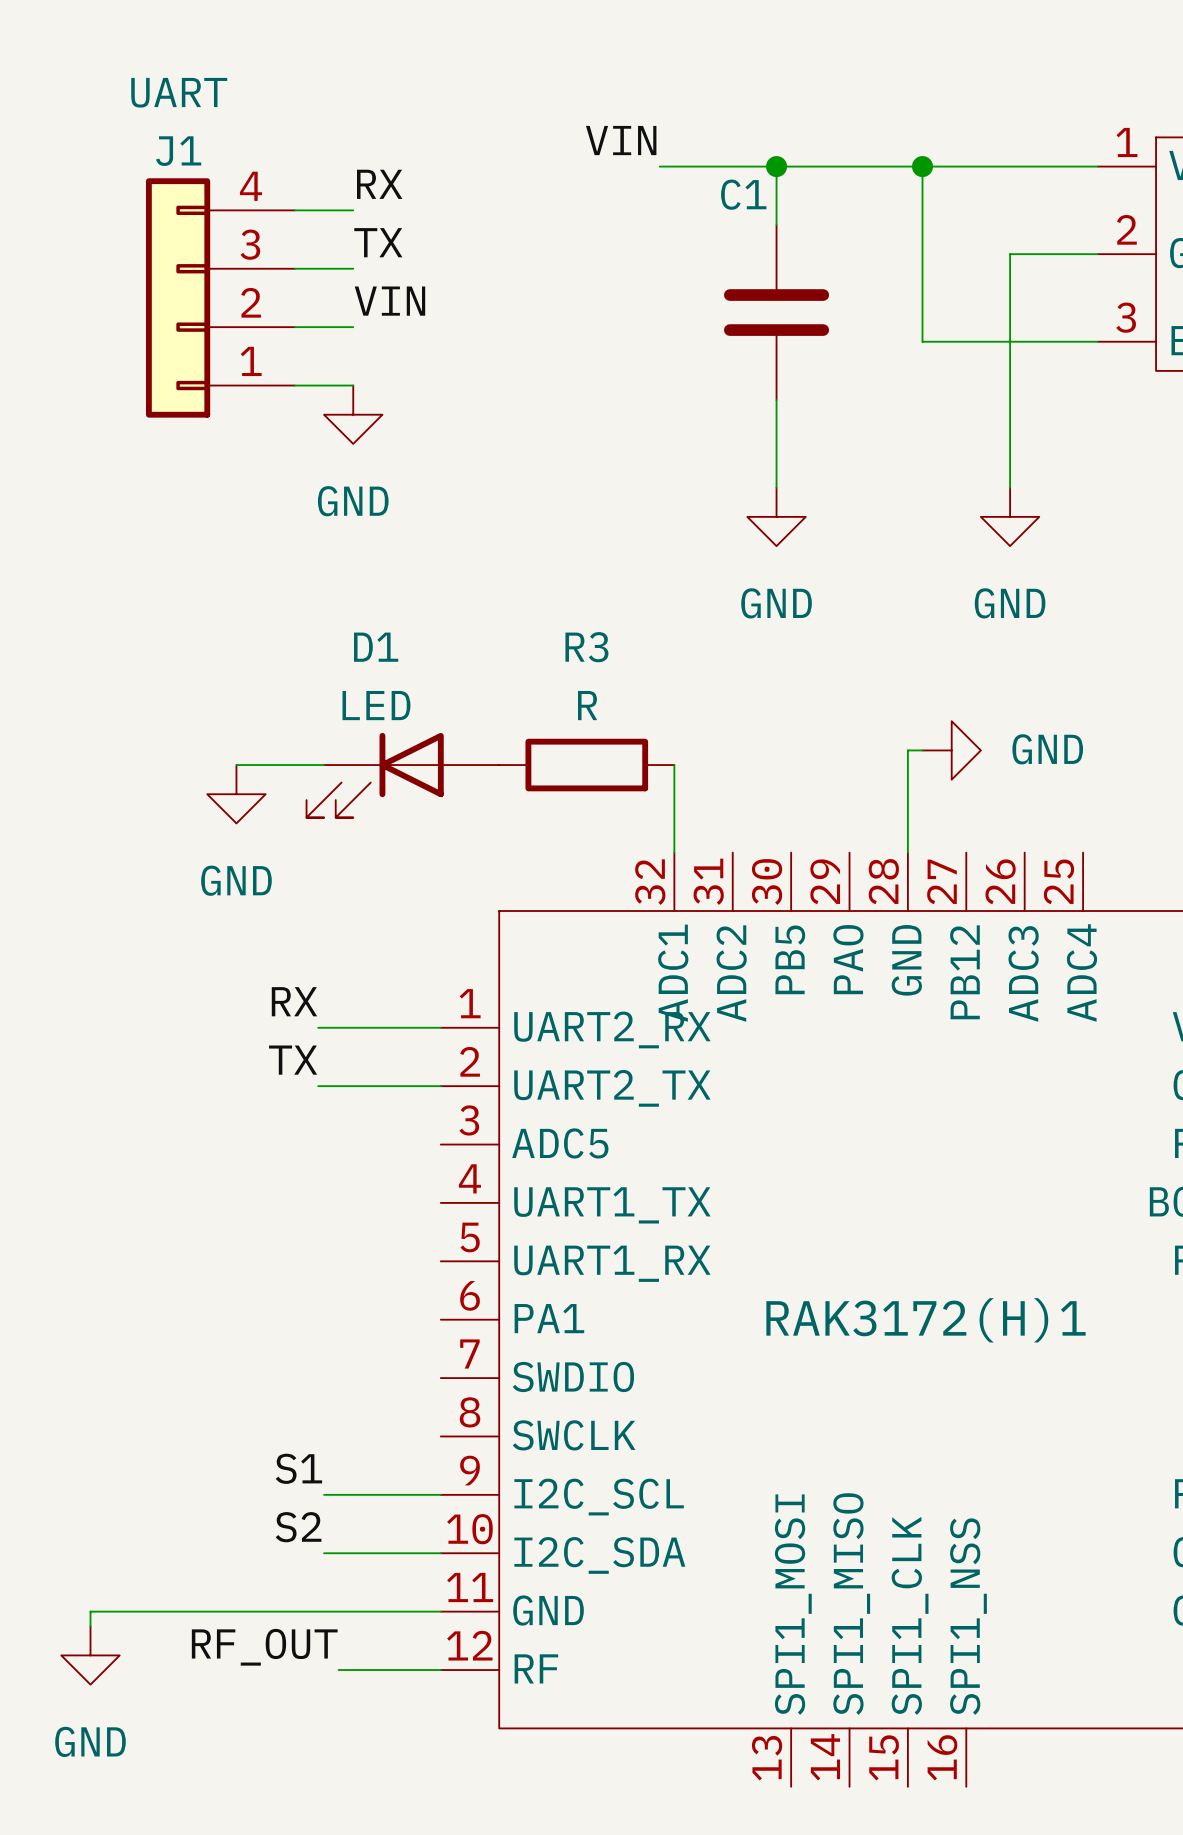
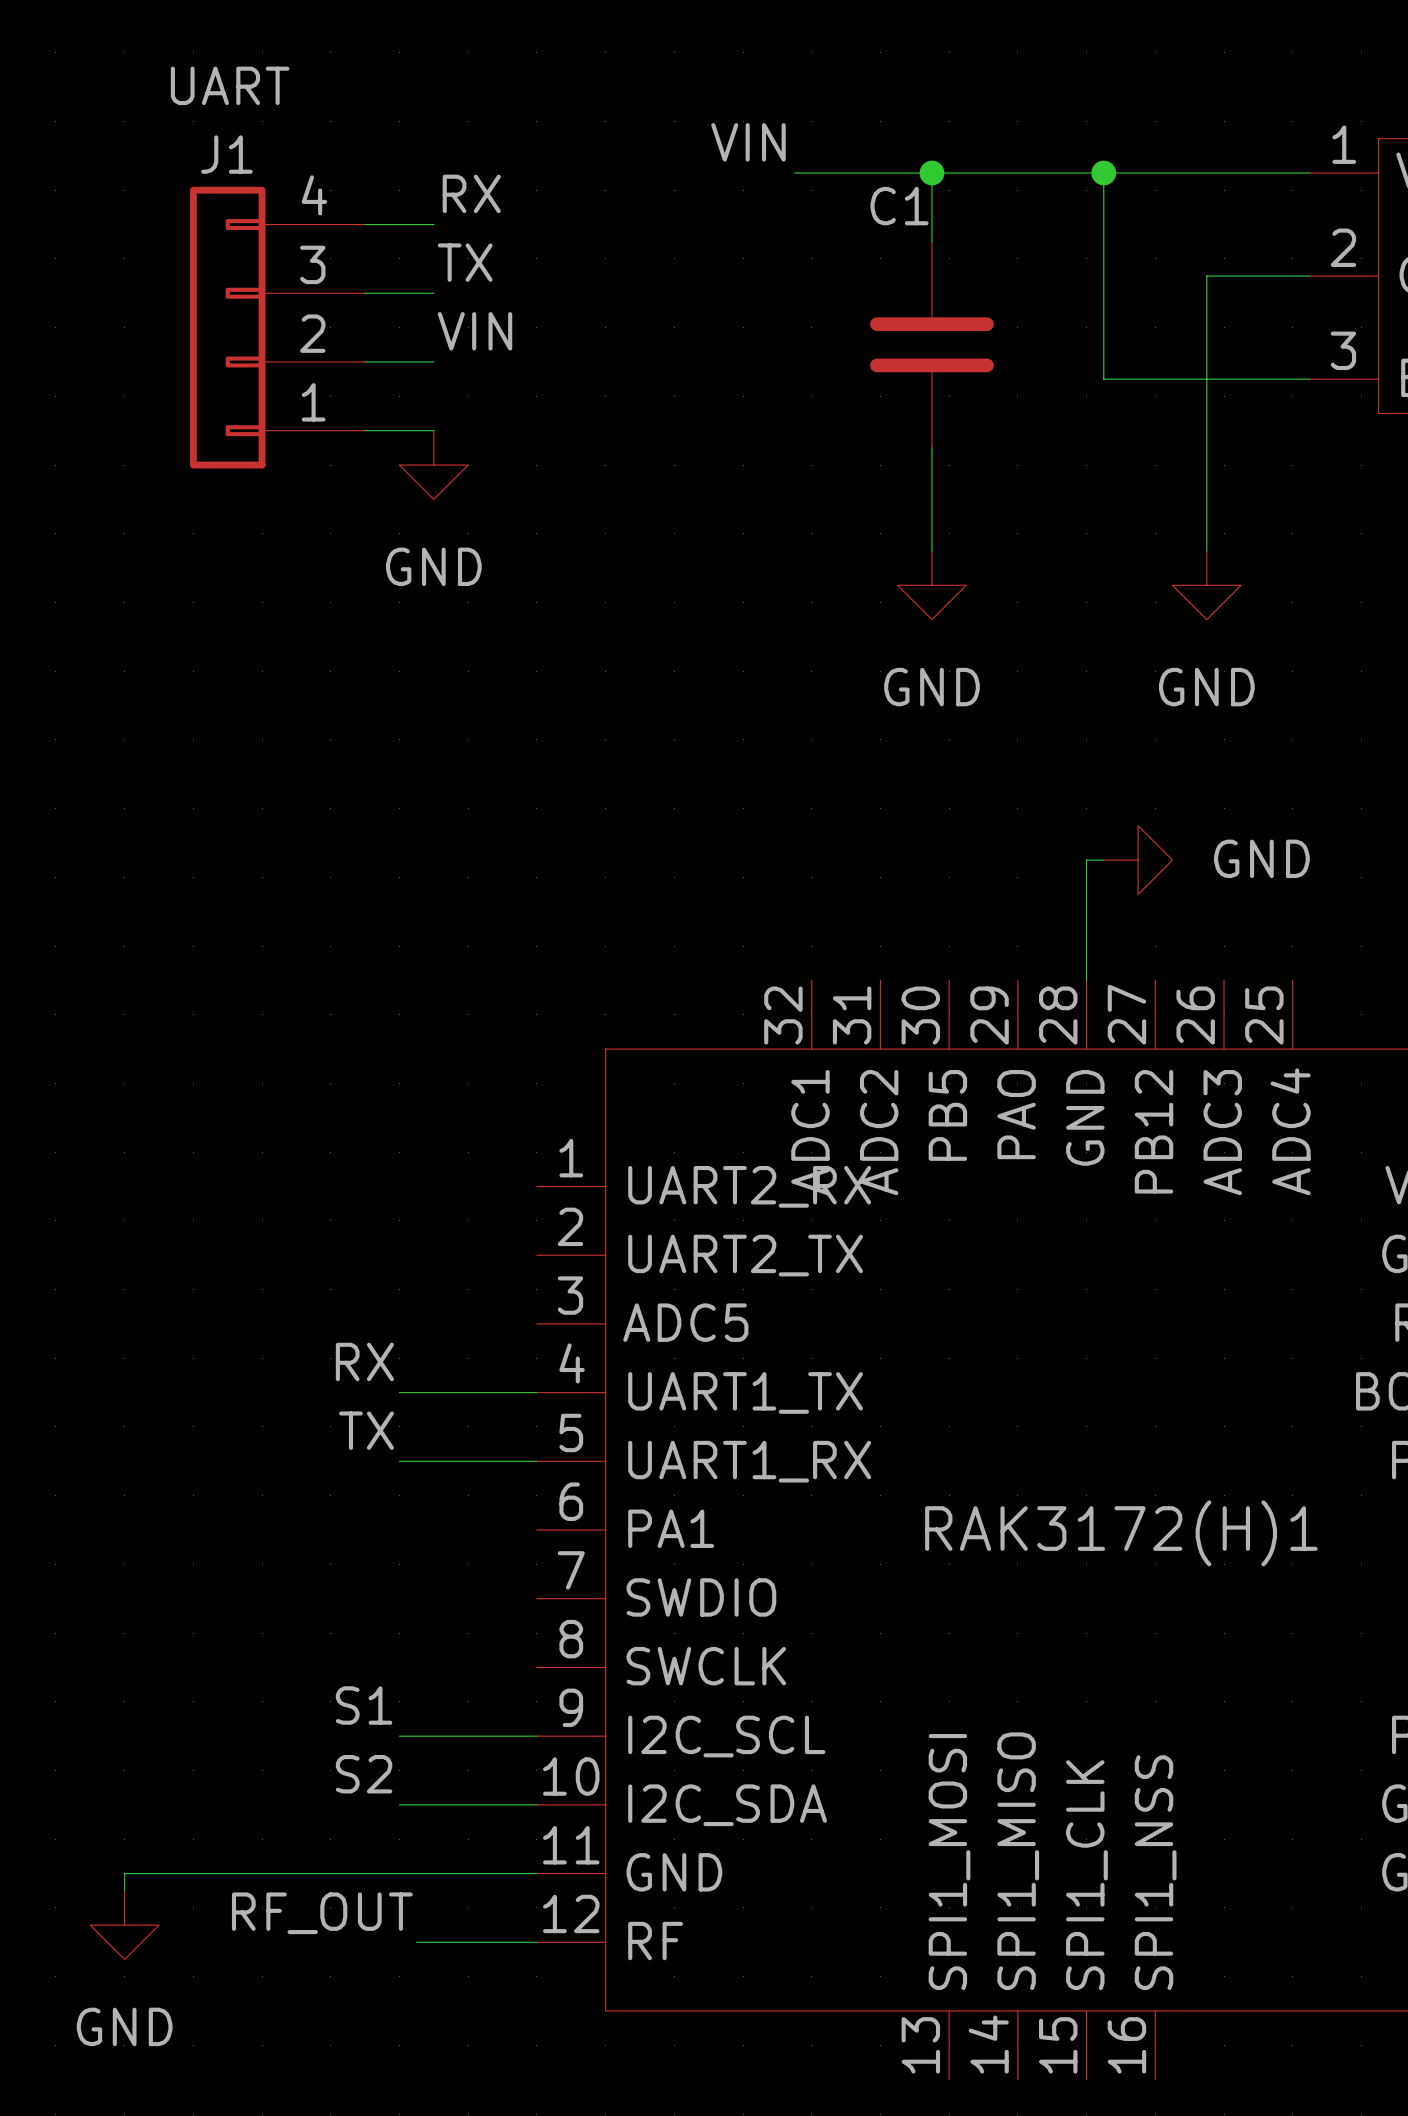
wire: (236, 765) (324, 765) -> none
R3: R (586, 765) -> none
wire: (674, 765) (674, 852) -> none
D1: LED (402, 775) -> none
power symbol: GND (236, 794) -> none
label position: RX (294, 1001) -> RX (364, 1361)
wire: (318, 1027) (440, 1027) -> none
label position: TX (293, 1060) -> TX (366, 1430)
wire: (318, 1086) (440, 1086) -> none
wire: none -> (399, 1392) (536, 1392)
wire: none -> (399, 1461) (536, 1461)

